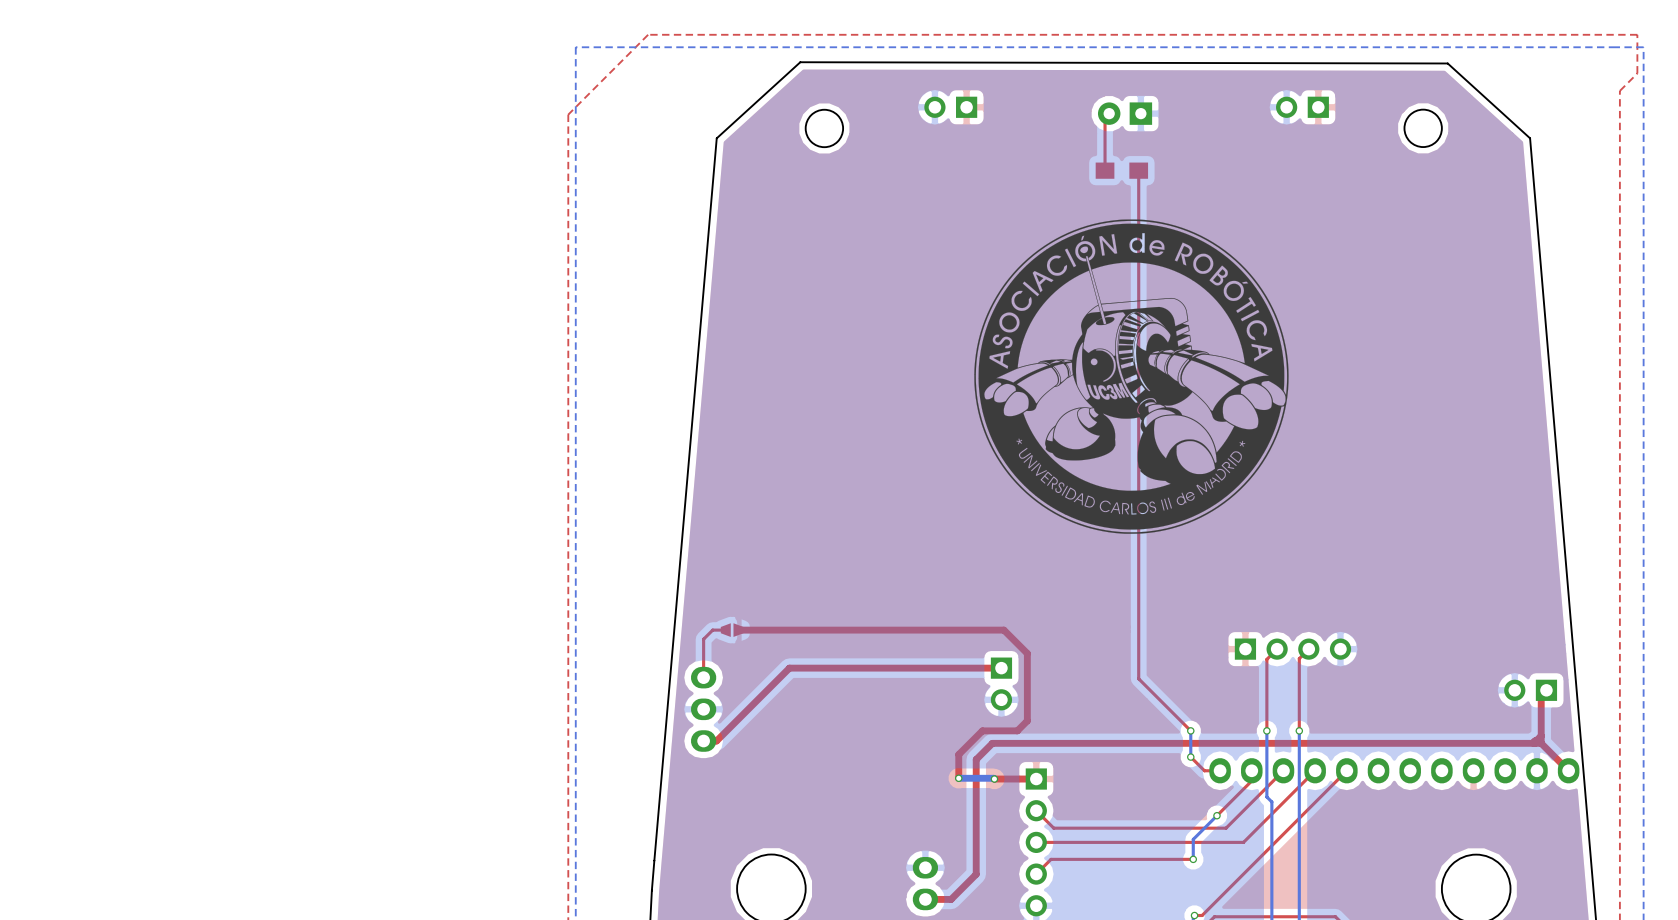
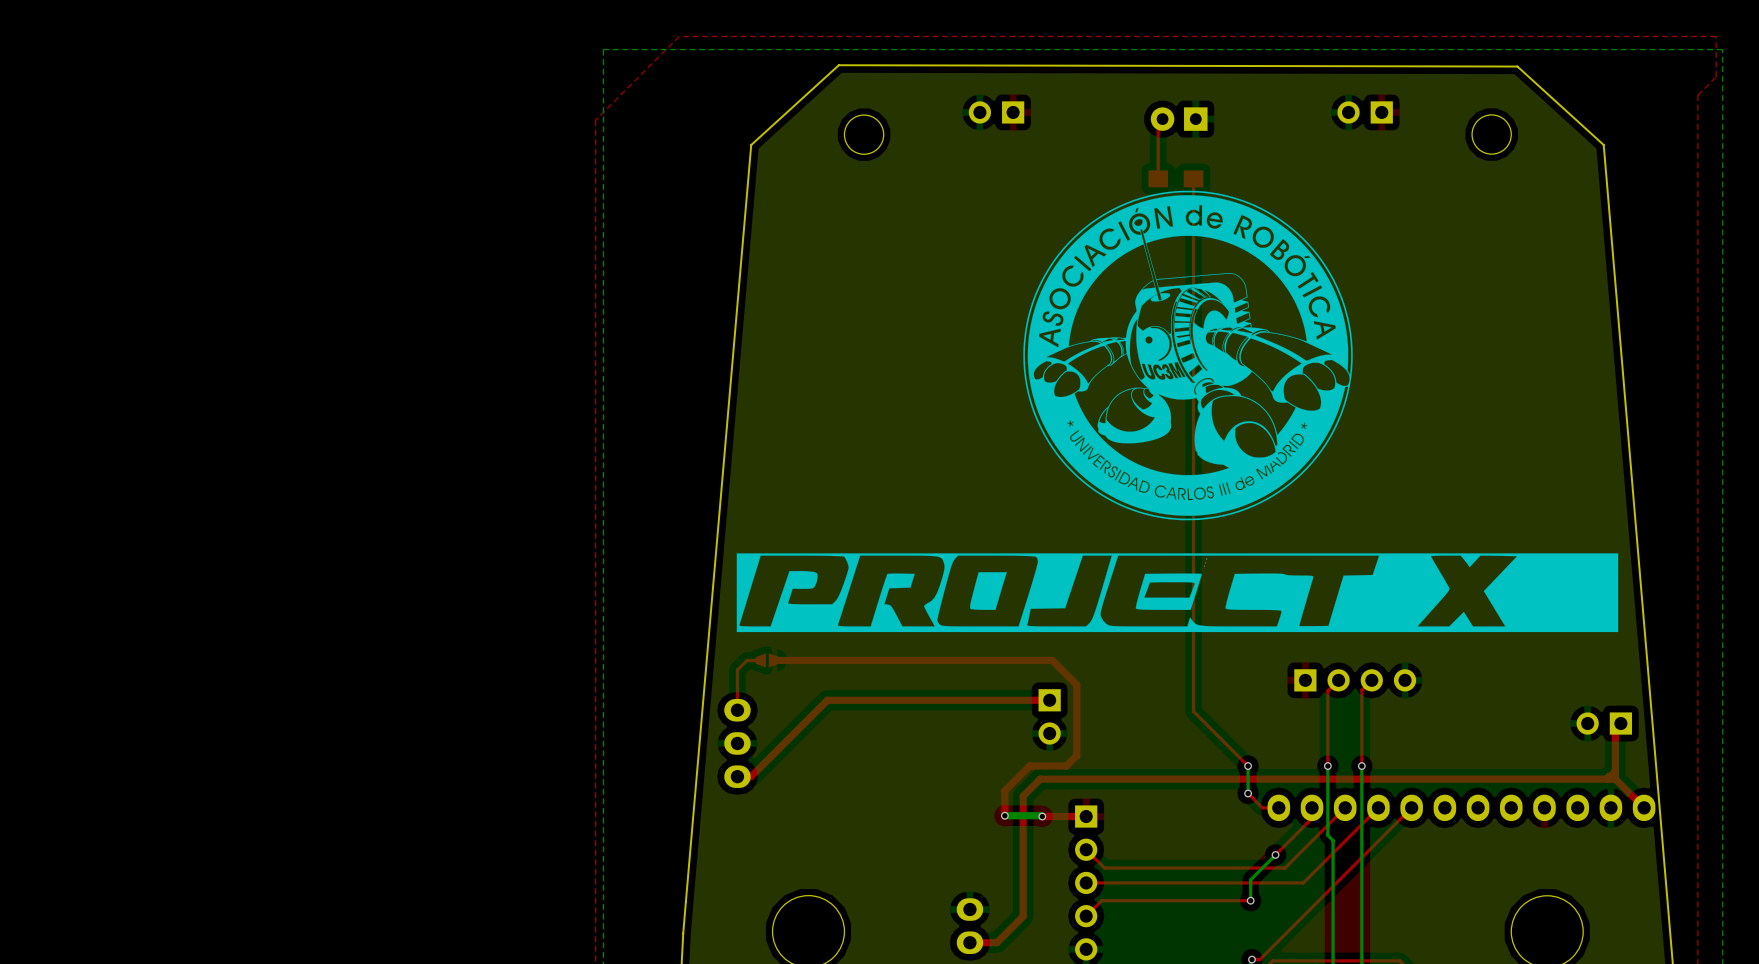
drawing position: (1131, 376) -> (1188, 355)
drawing: none -> [736, 553, 1619, 633]

